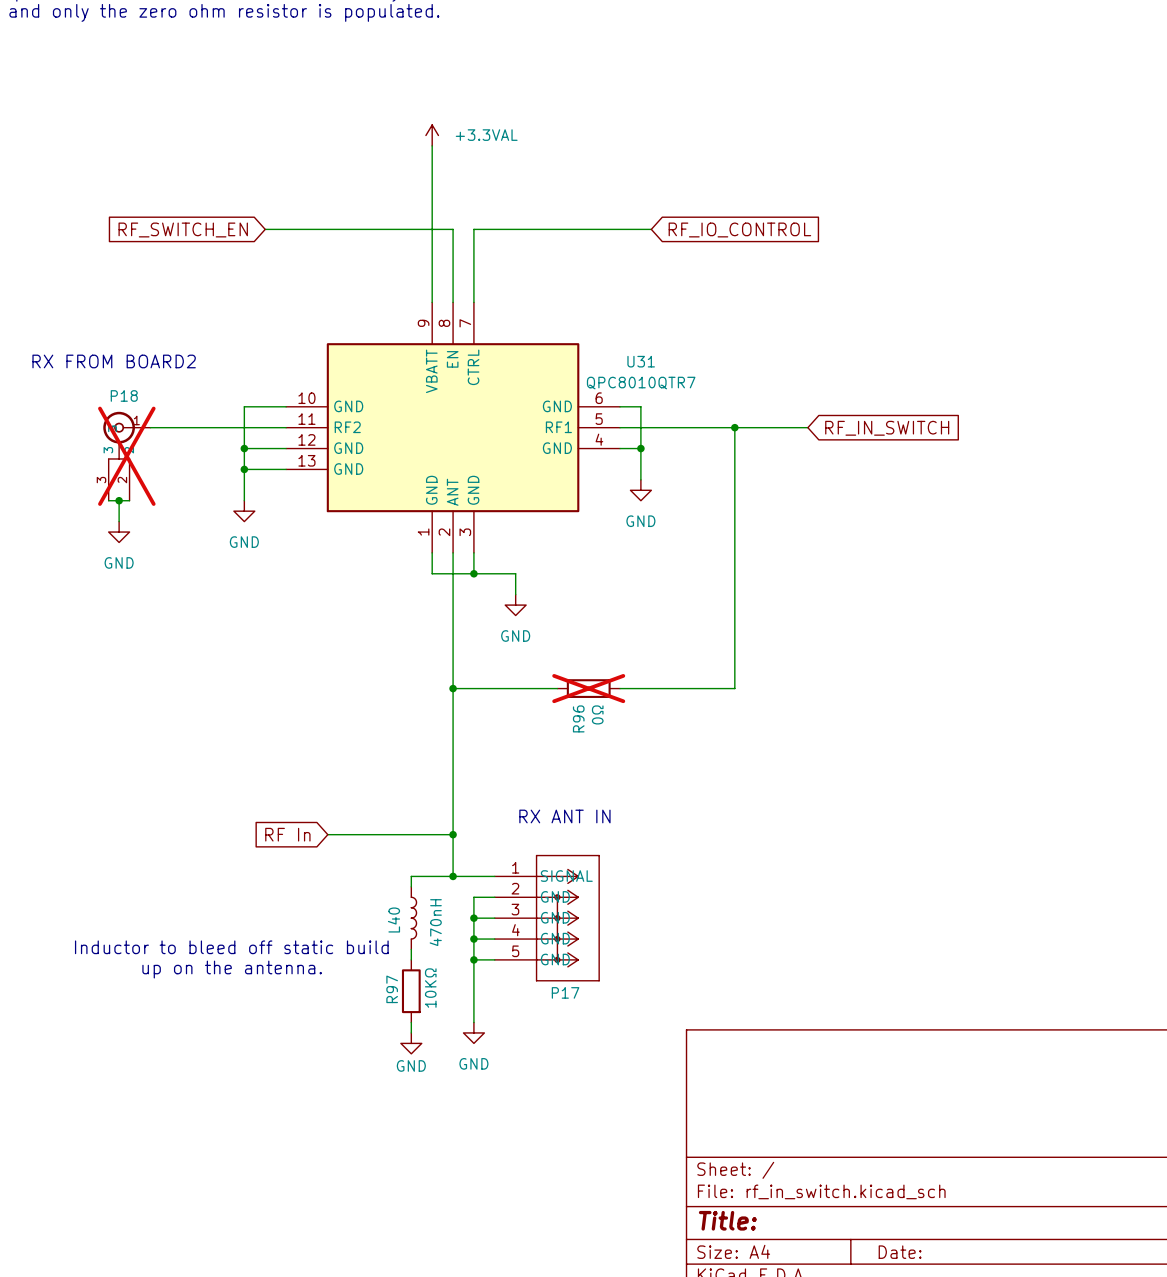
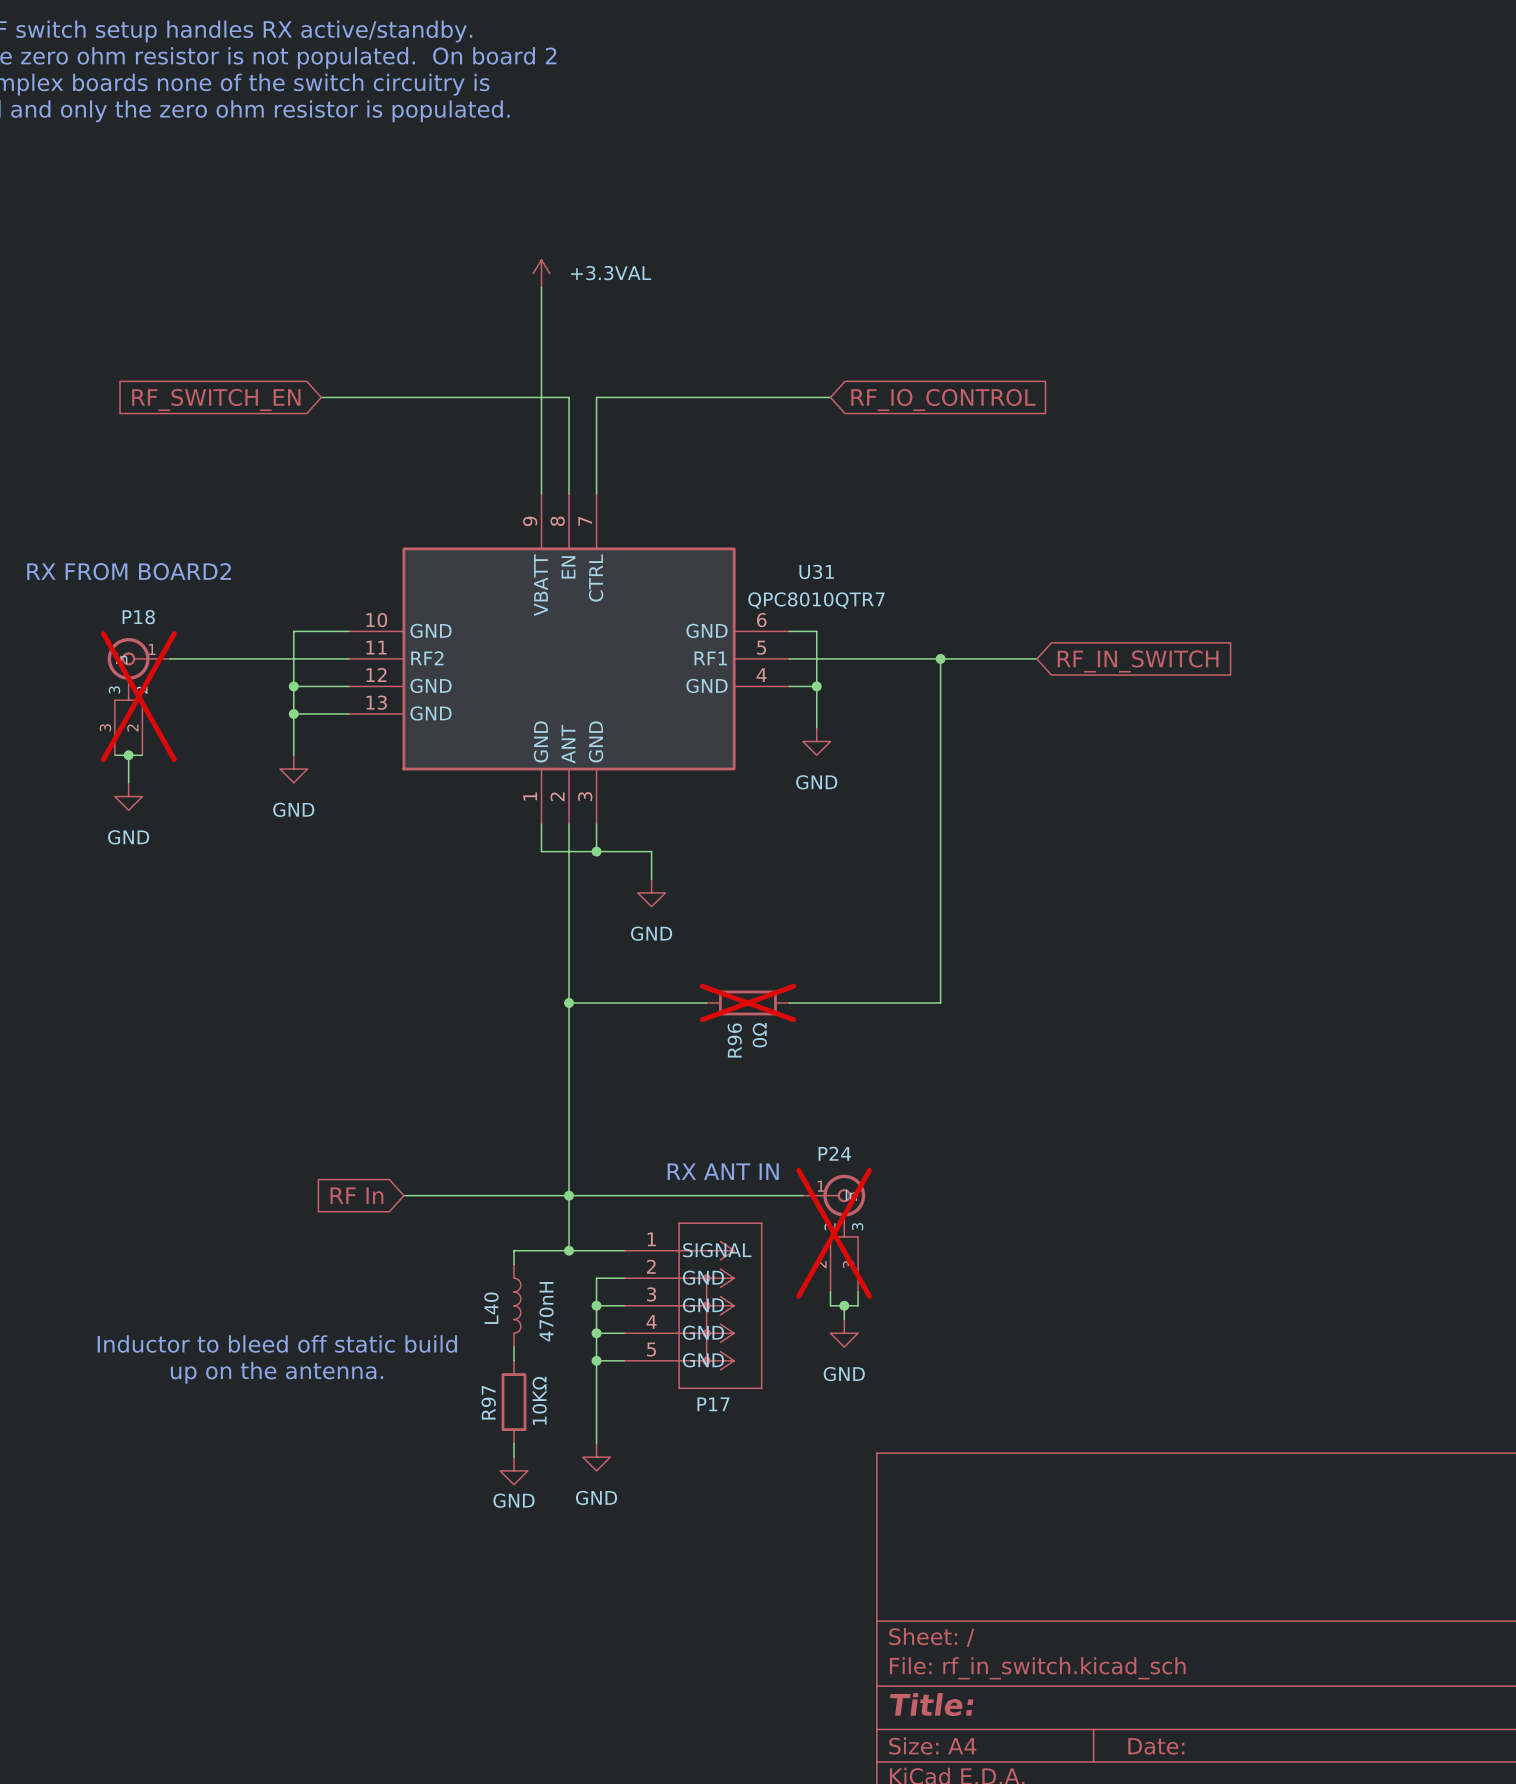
wire: none -> (569, 1195) (802, 1195)
P24: none -> (834, 1233)
wire: none -> (830, 1292) (830, 1305) (858, 1305) (858, 1292)
wire: none -> (844, 1305) (844, 1319)
junction: none -> (844, 1305)
power symbol: none -> GND (844, 1333)

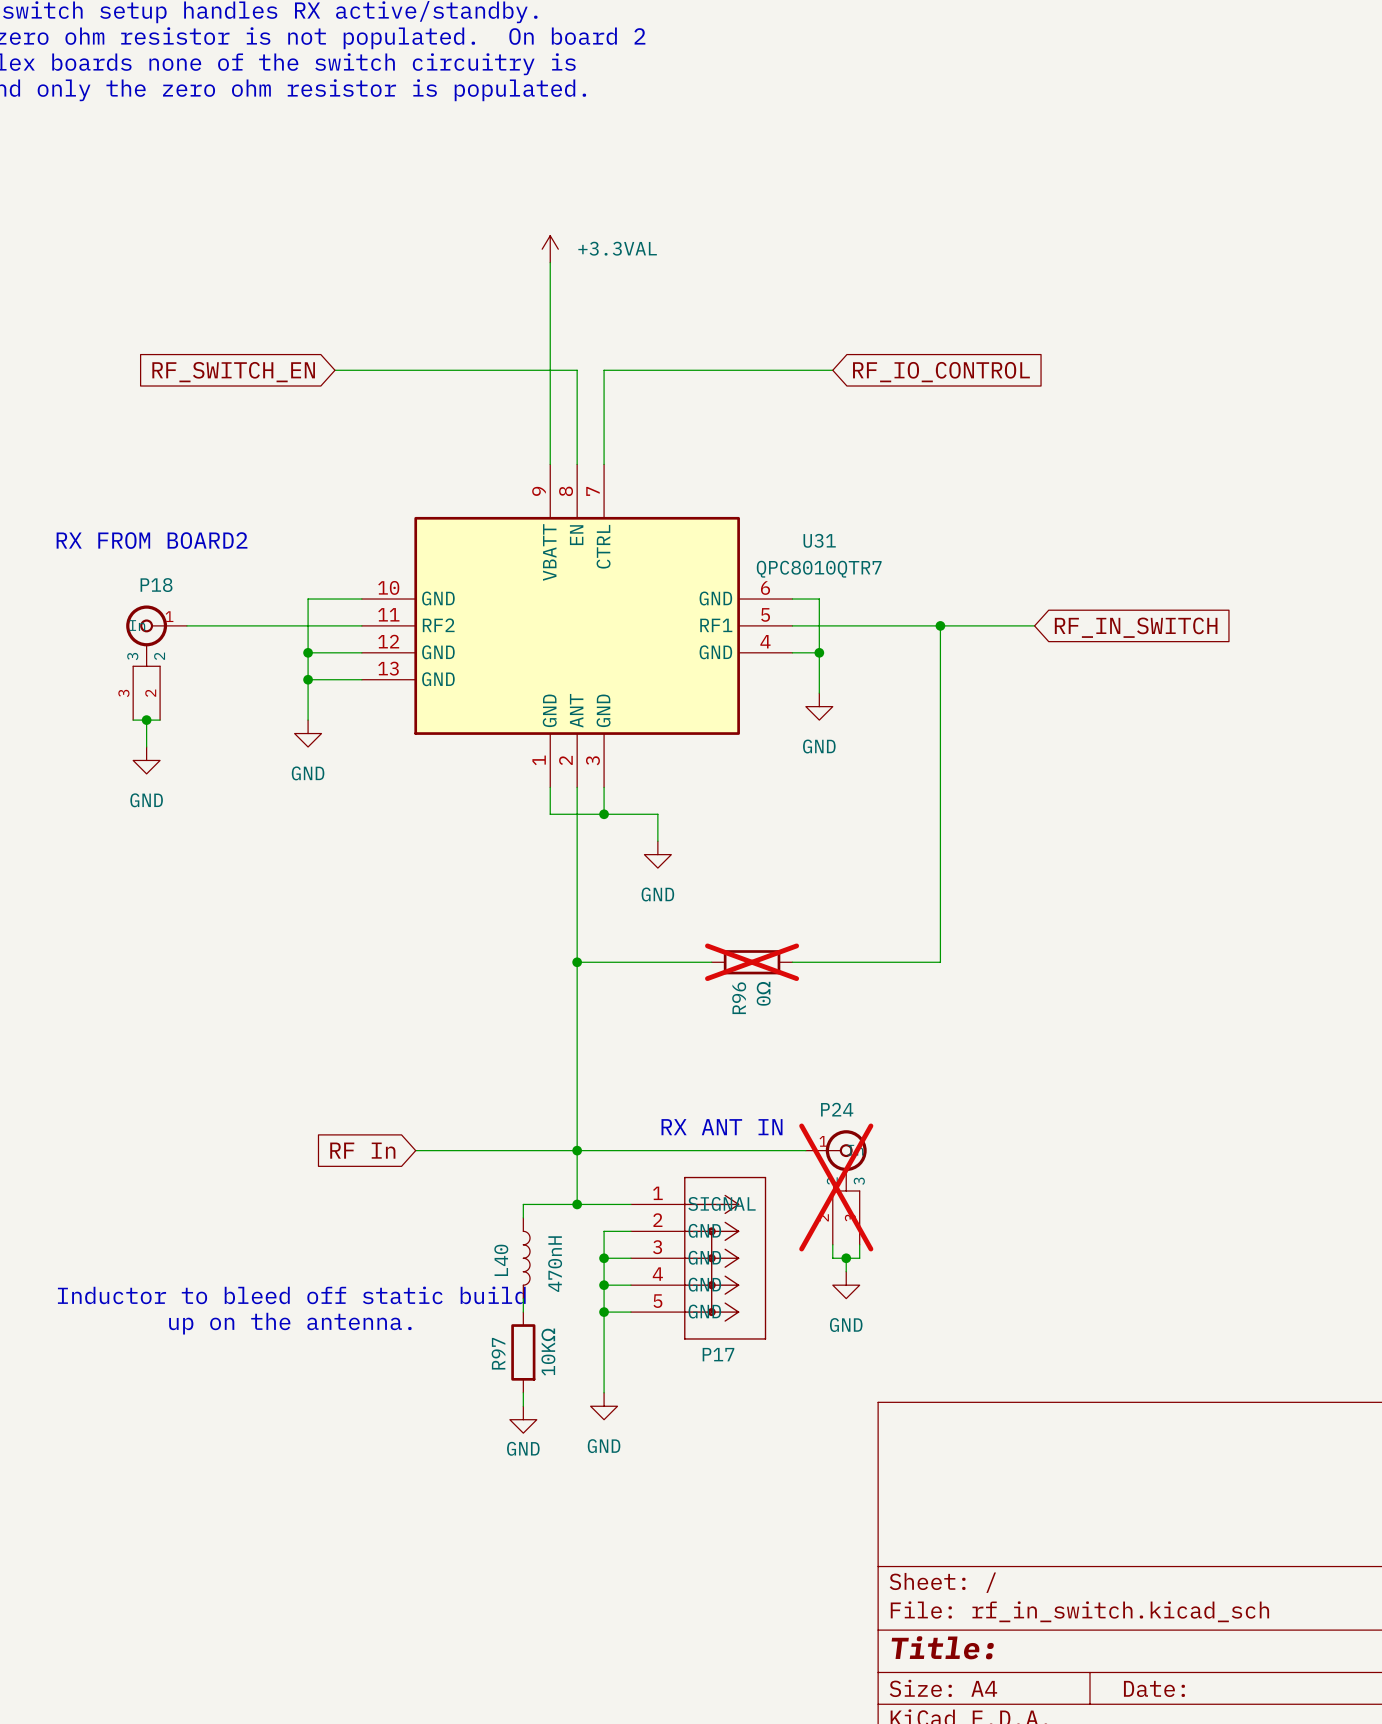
P18 do-not-place cross: (138, 696) -> none

